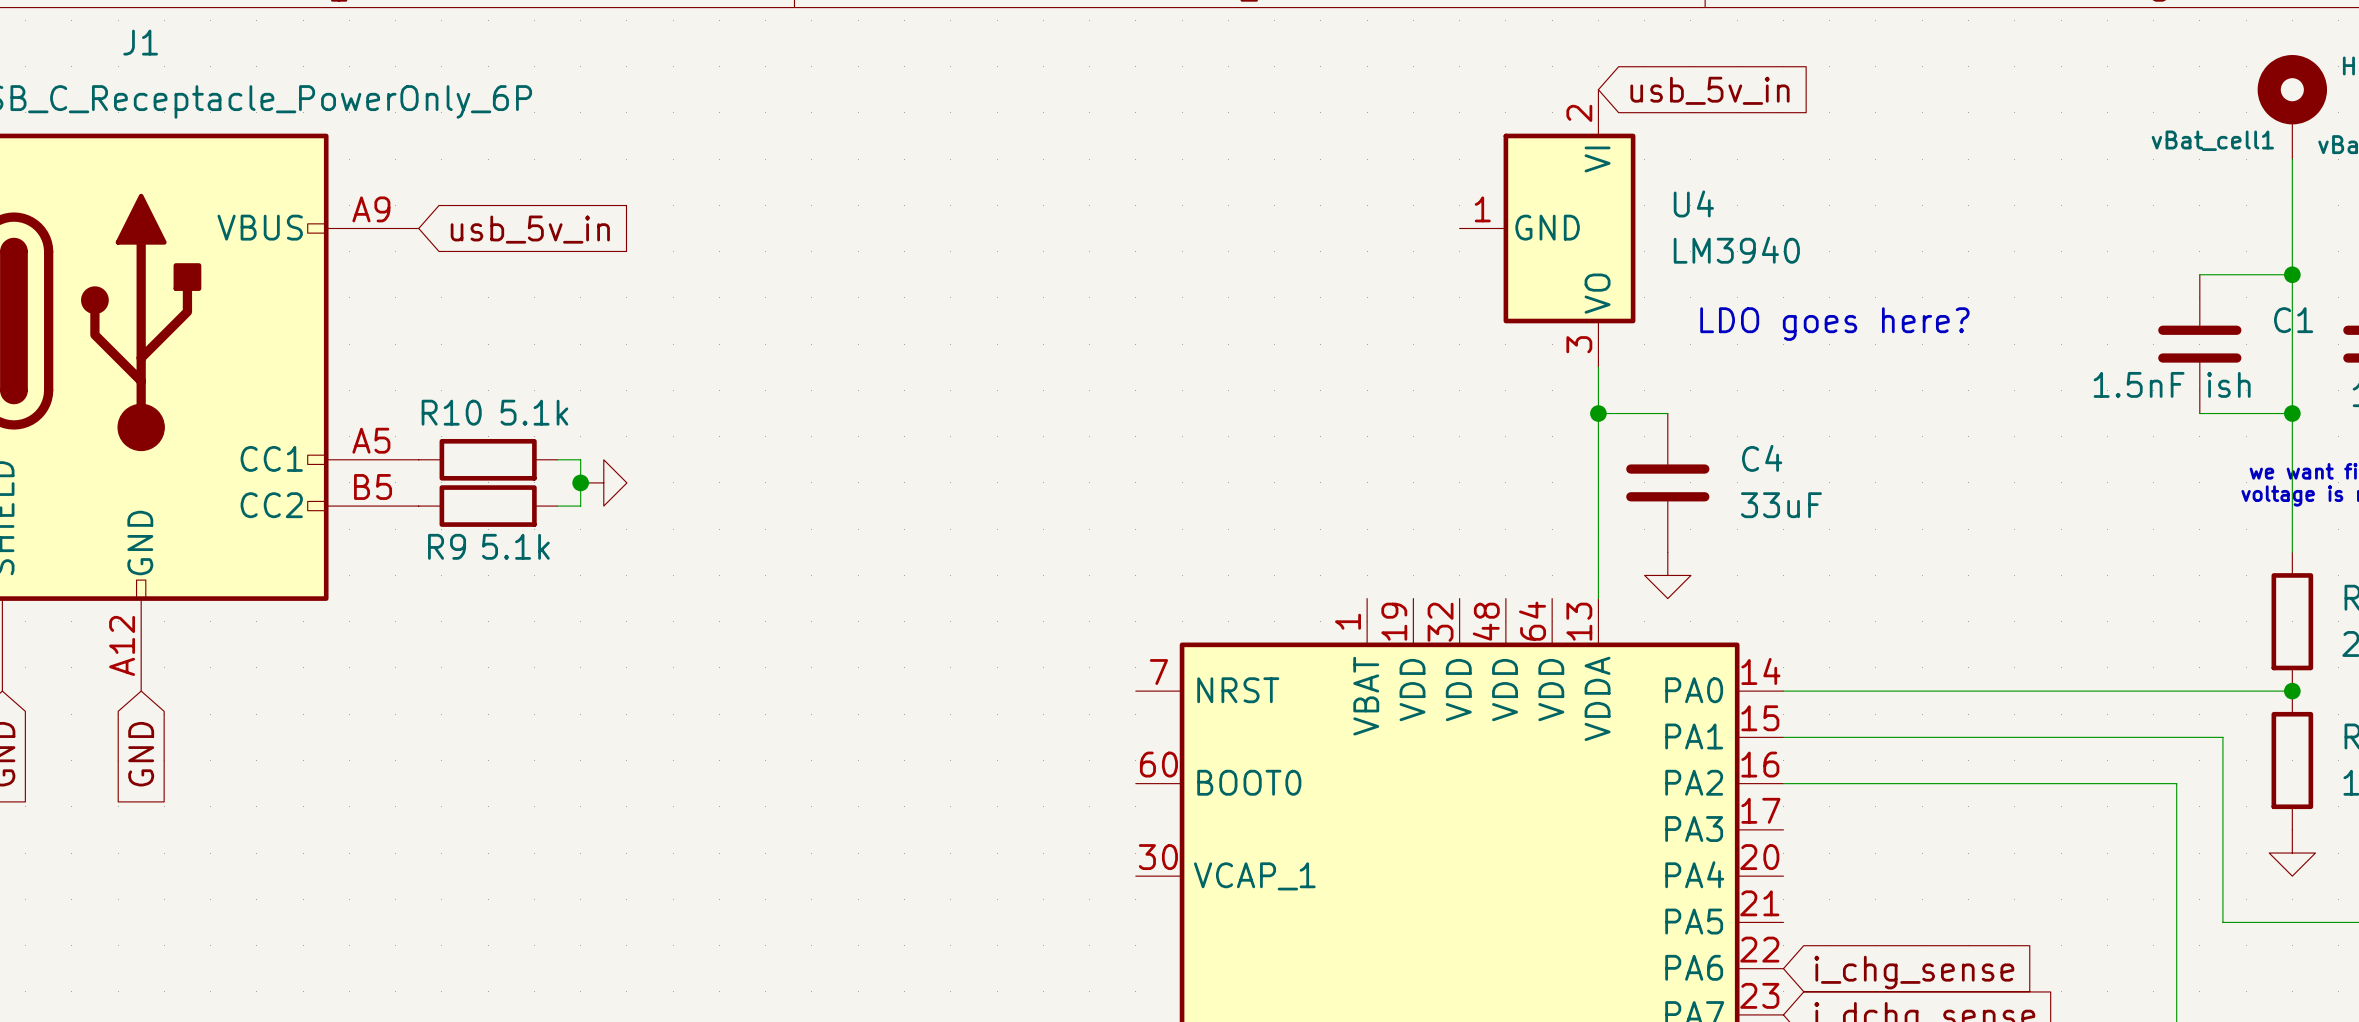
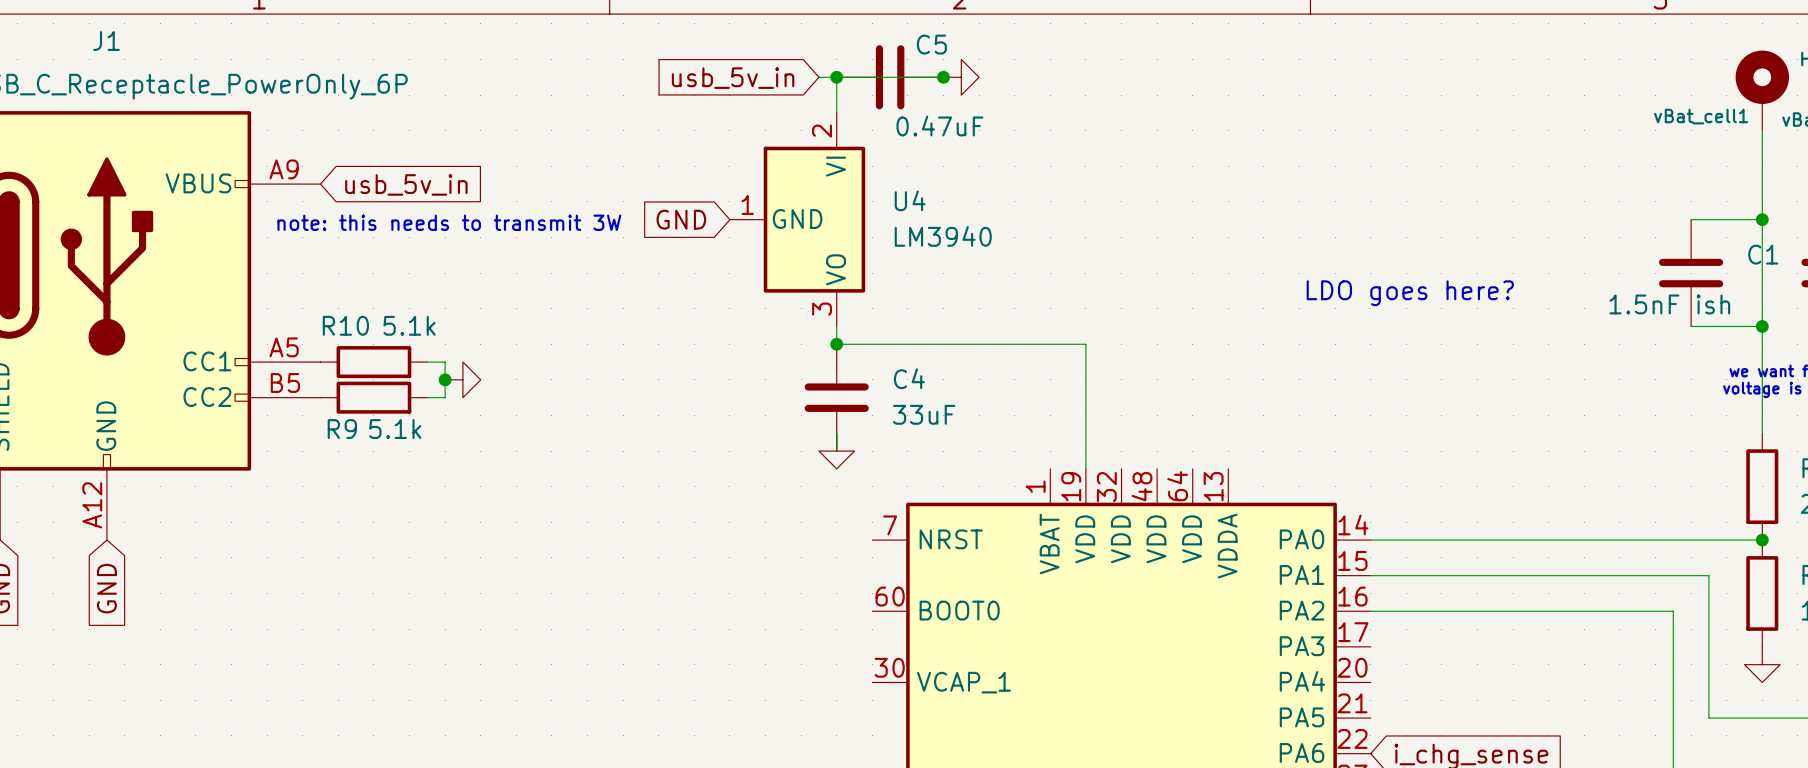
wire: none -> (818, 77) (943, 77)
wire: none -> (836, 77) (836, 112)
junction: none -> (836, 77)
C5: none -> 0.47uF (890, 77)
junction: none -> (943, 77)
power symbol: none -> (961, 77)
global label: none -> usb_5v_in (733, 78)
global label: usb_5v_in (1709, 90) -> none
U4 position: (1547, 228) -> (797, 219)
global label: none -> GND (681, 219)
text: none -> note: this needs to transmit 3W (449, 222)
text position: LDO goes here? (1834, 324) -> LDO goes here? (1410, 293)
wire: (1598, 367) (1598, 598) -> none
wire: none -> (836, 326) (836, 344) (1085, 344) (1085, 468)
wire: (1598, 413) (1667, 413) -> none
junction: (1598, 413) -> none
junction: none -> (836, 344)
C4 position: (1667, 482) -> (836, 397)
wire: none -> (836, 433) (836, 451)
power symbol: none -> (836, 451)
power symbol: (1667, 575) -> none

